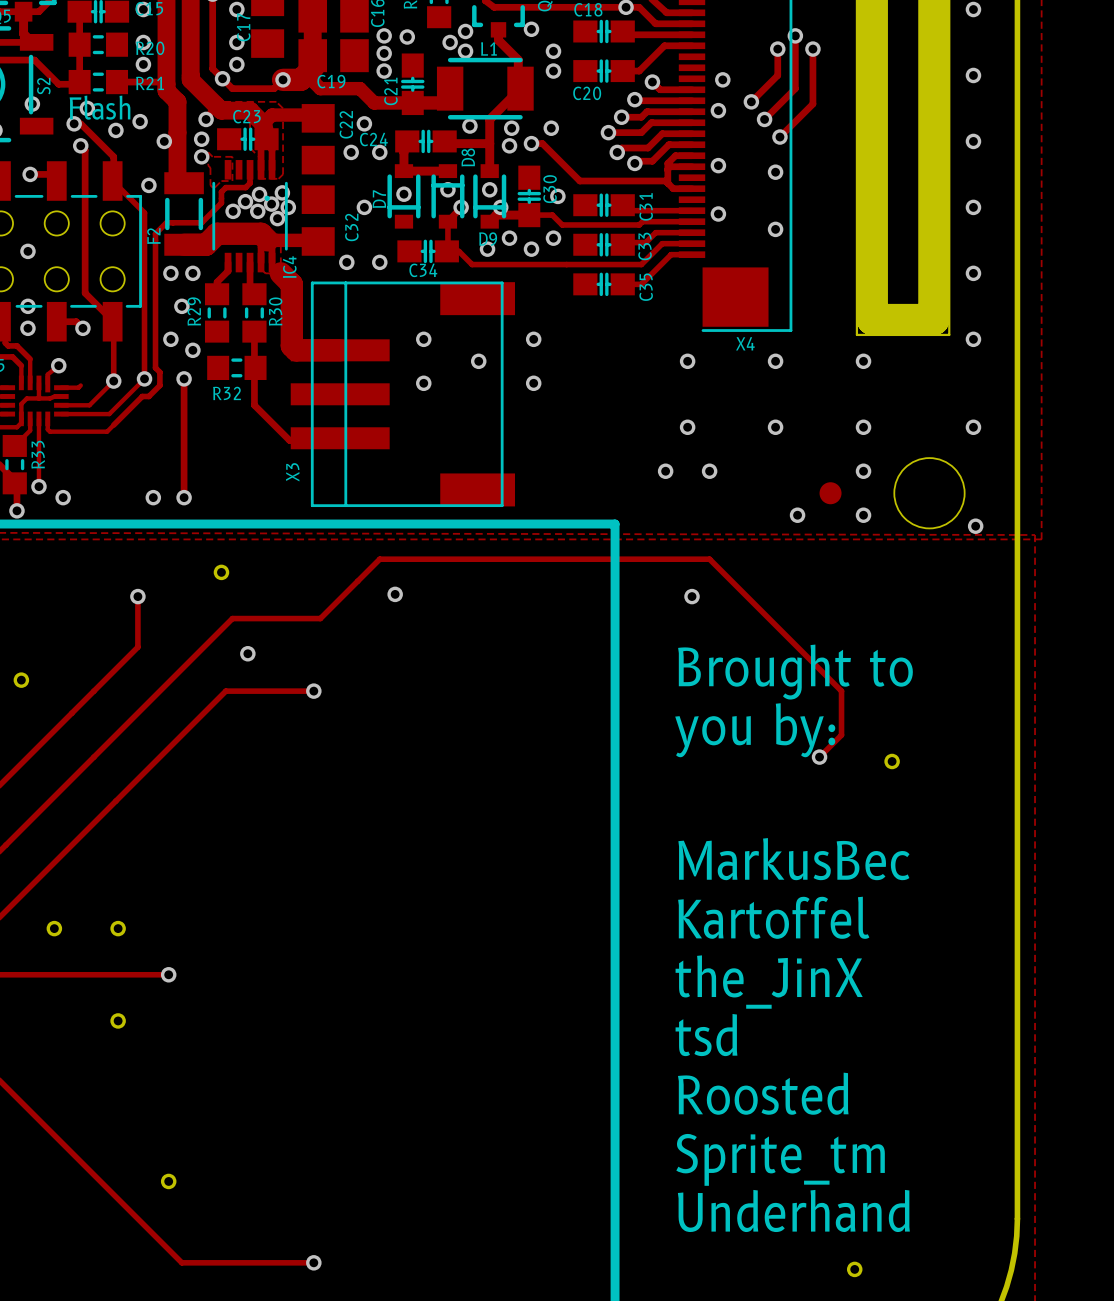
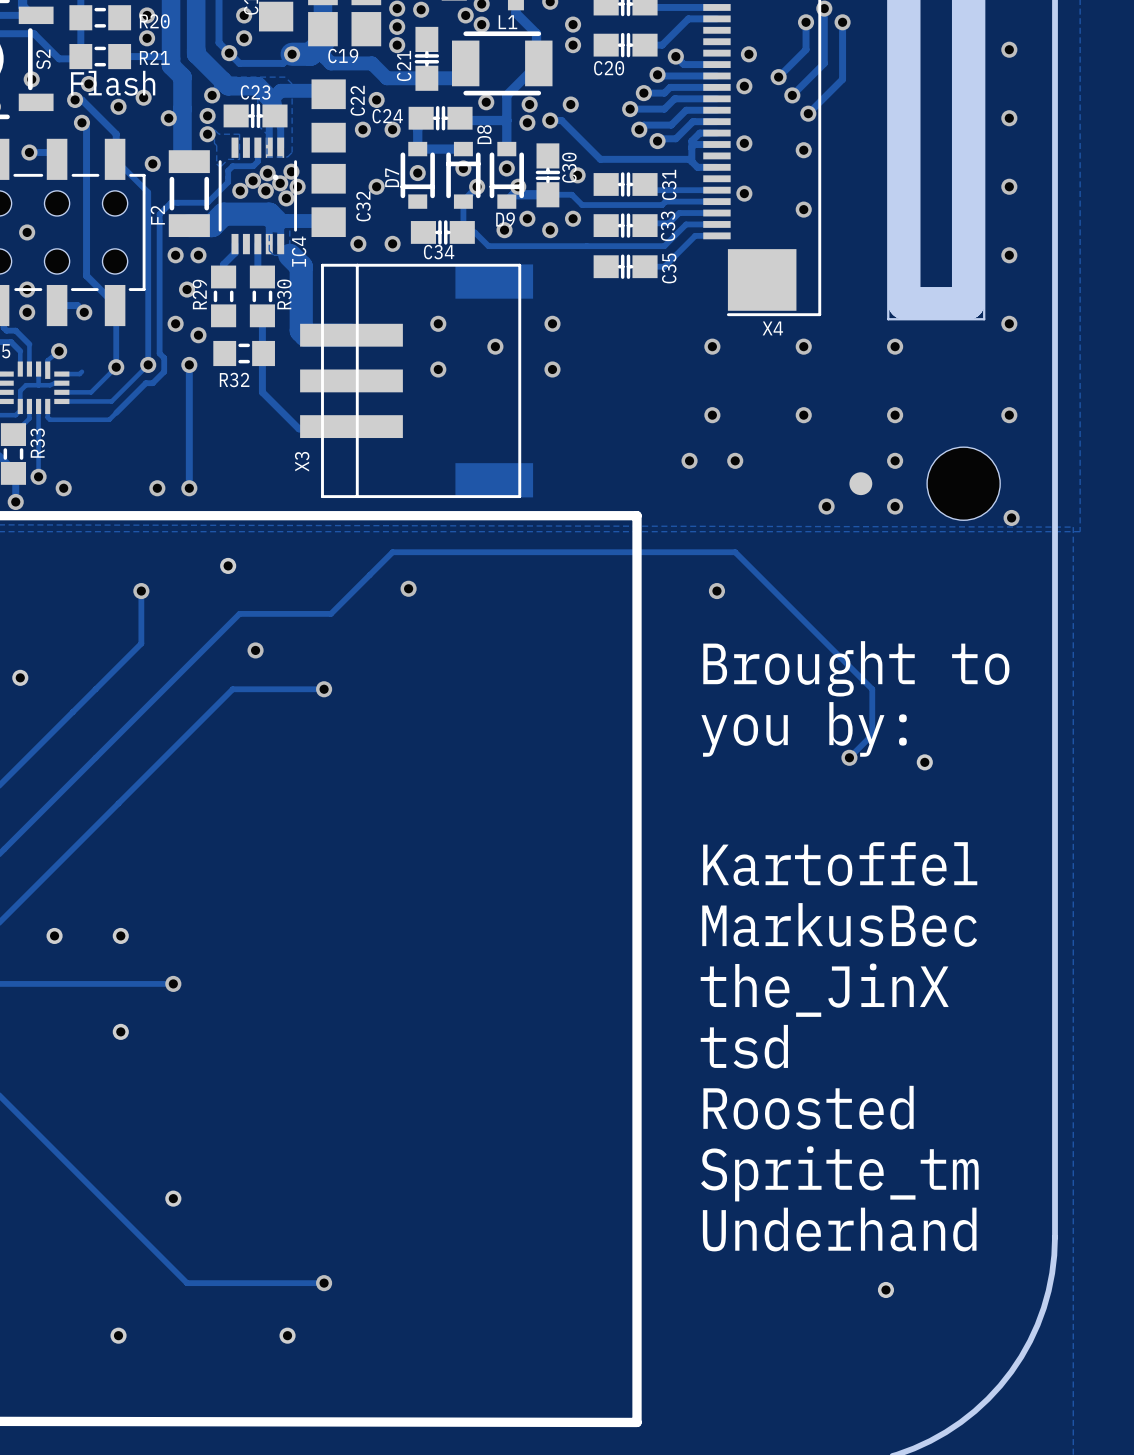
text: MarkusBec (793, 859) -> Kartoffel (840, 864)
text: Kartoffel (773, 917) -> MarkusBec (839, 924)

